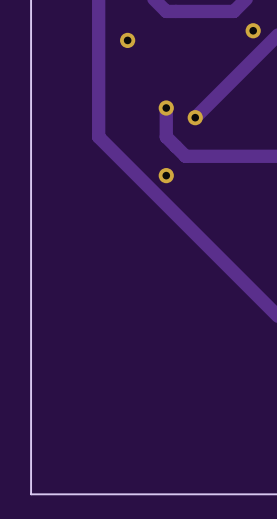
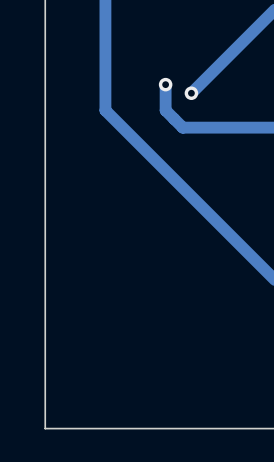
via: (253, 30) -> none
via: (127, 40) -> none
via: (166, 175) -> none

